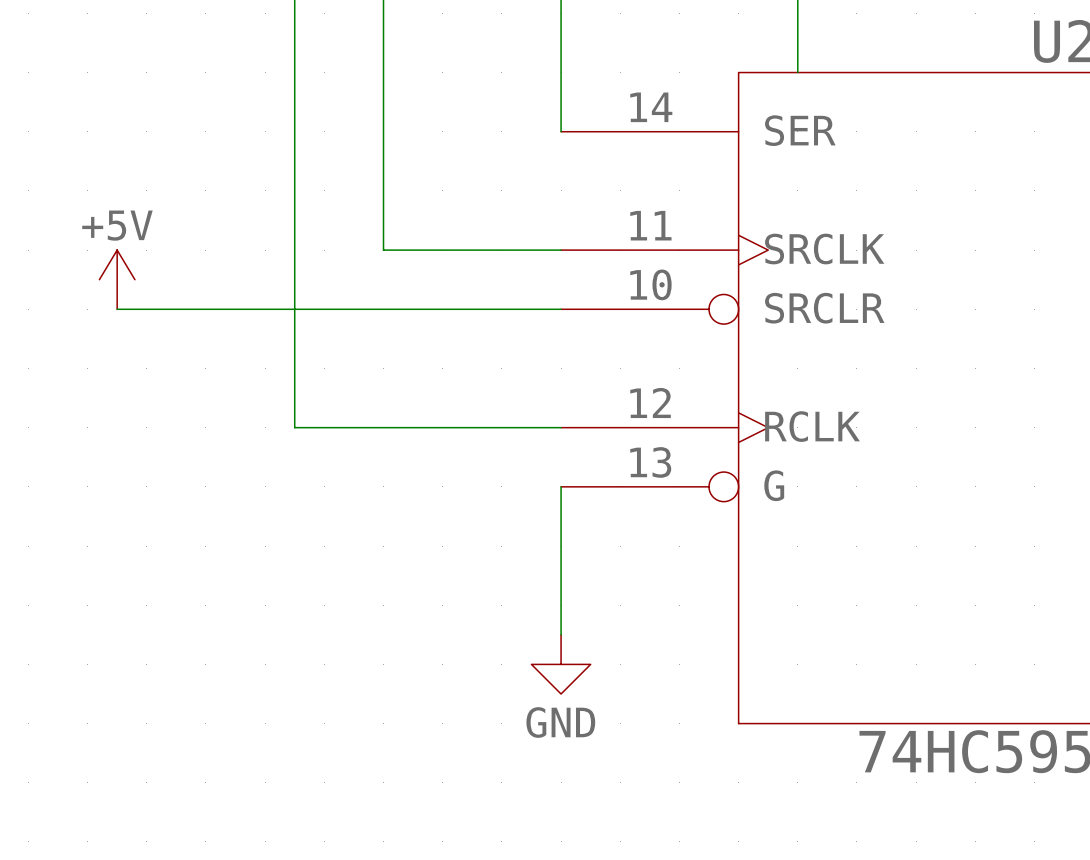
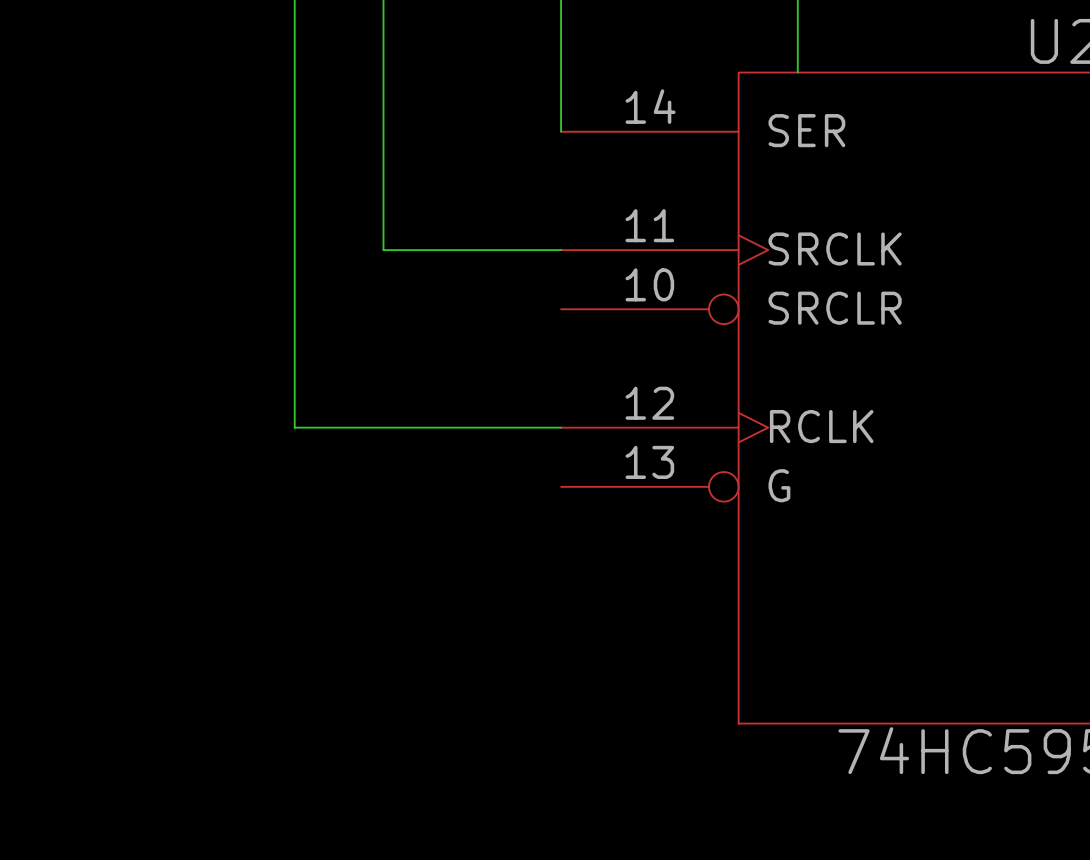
power symbol: +5V (117, 279) -> none
wire: (117, 309) (561, 309) -> none
wire: (561, 486) (561, 634) -> none
power symbol: GND (561, 664) -> none

